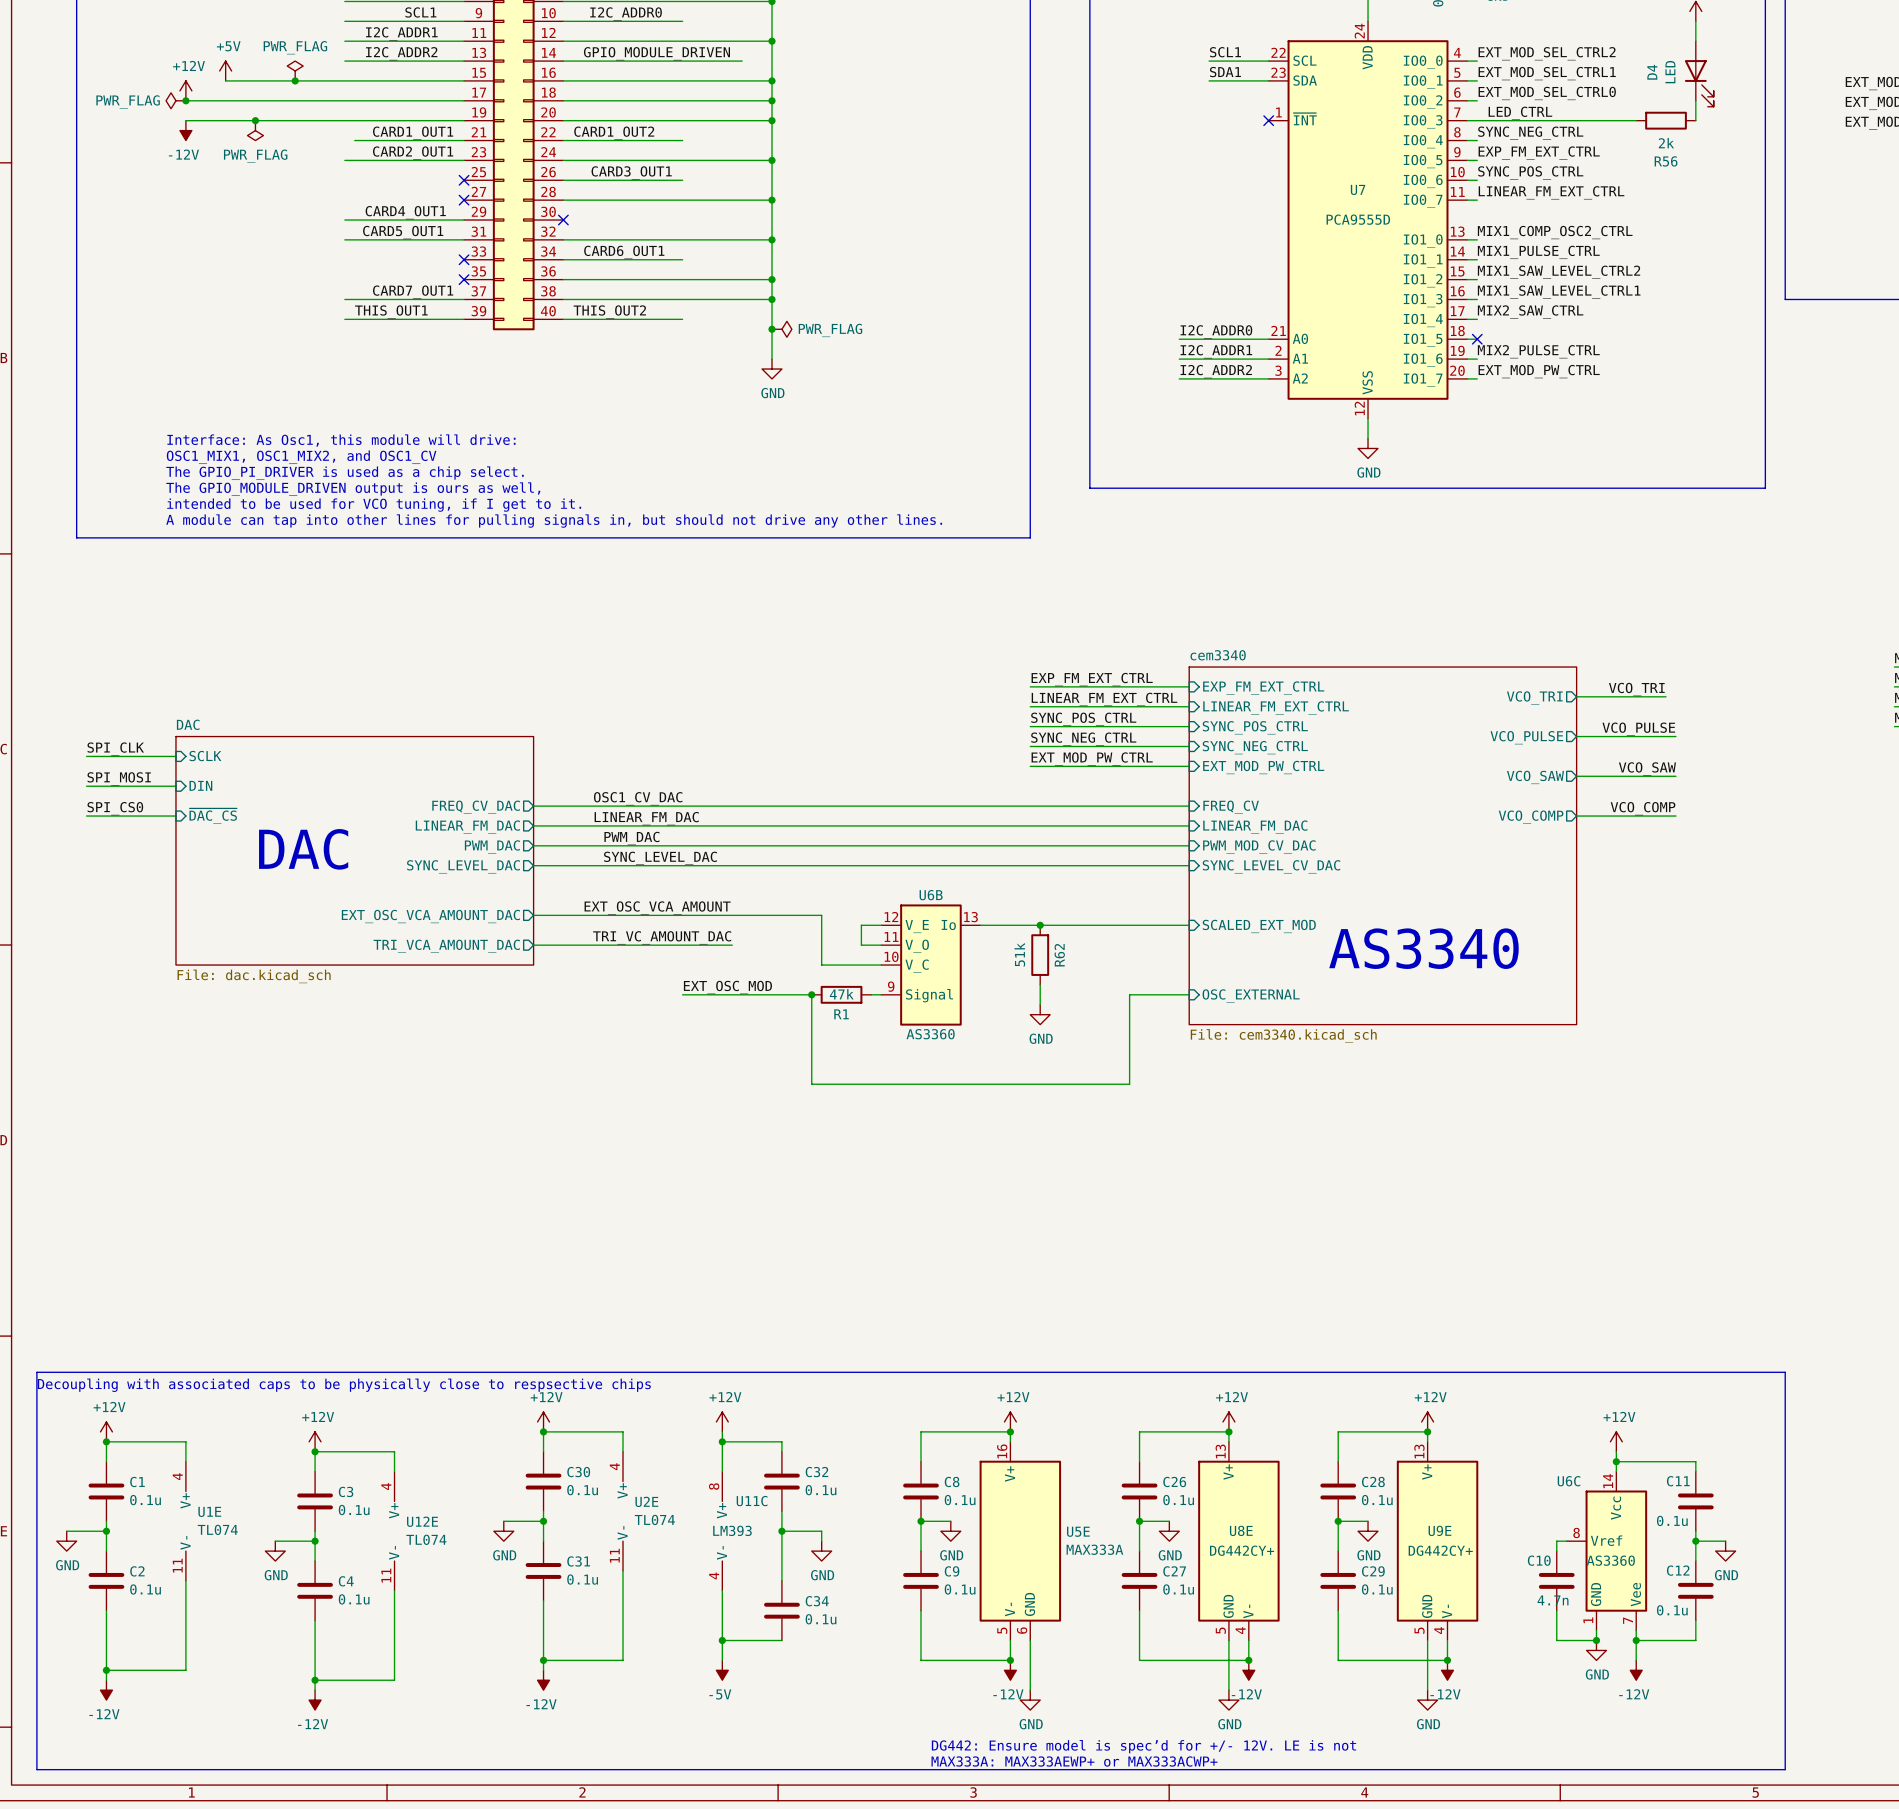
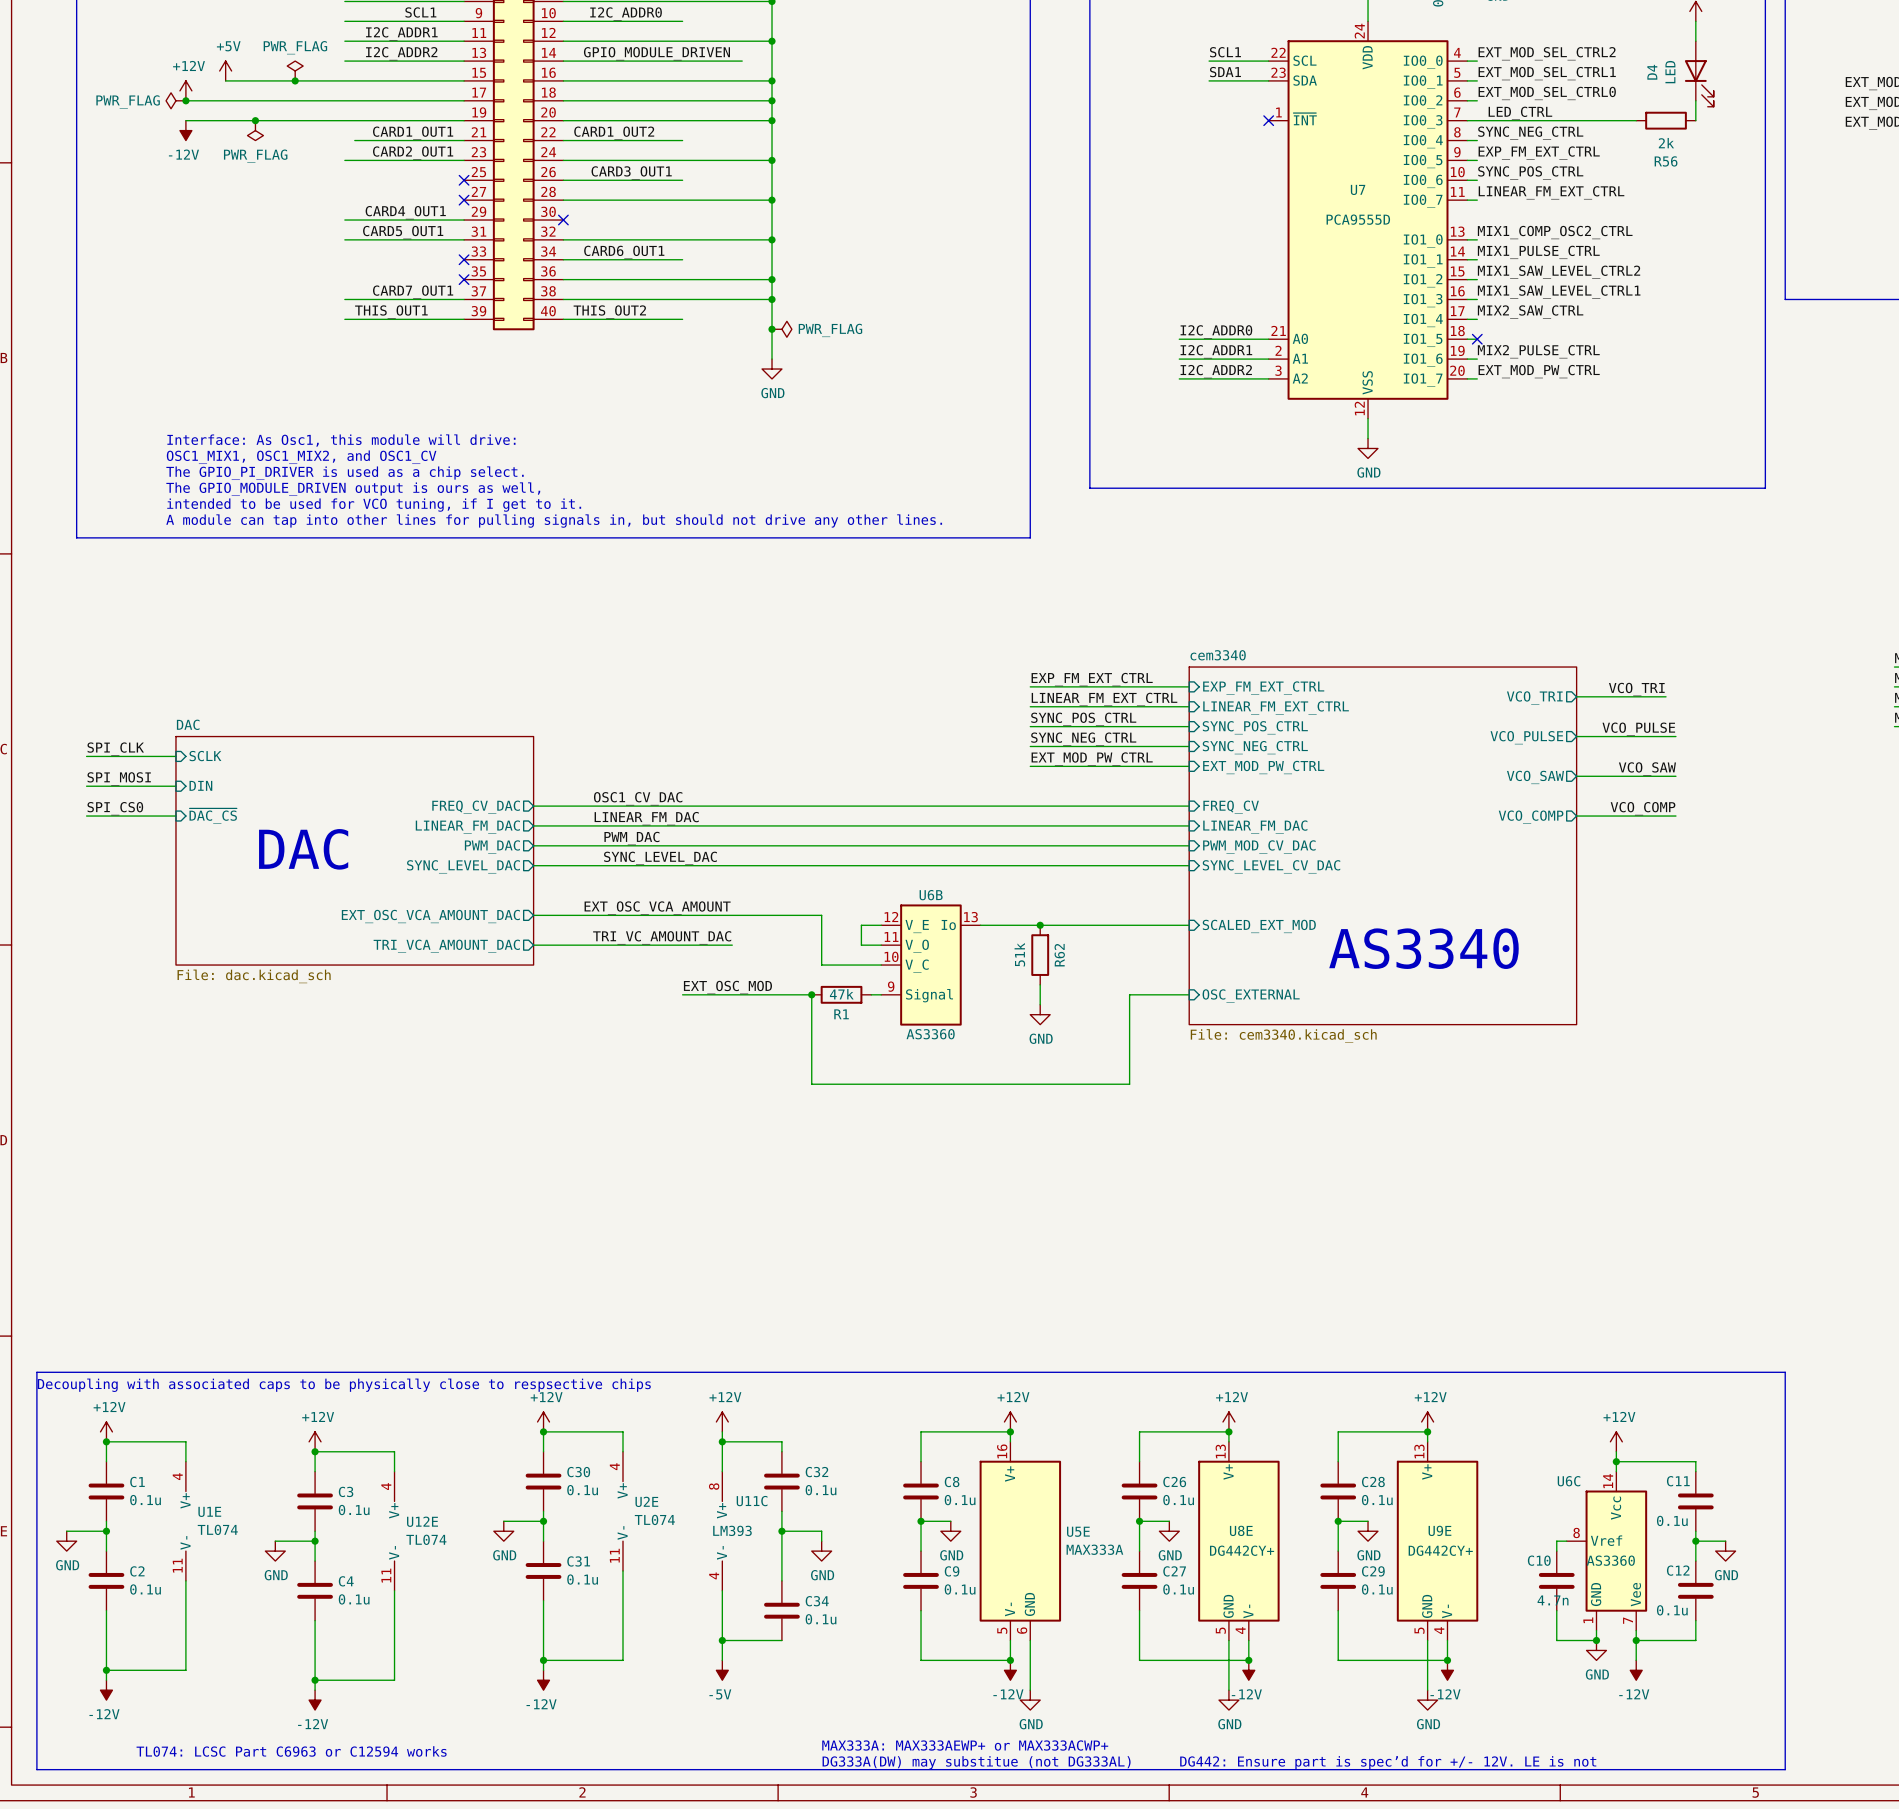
text: DG442: Ensure model is spec’d for +/- 12V. LE is not (1144, 1746) -> none
text: none -> TL074: LCSC Part C6963 or C12594 works (291, 1751)
text position: MAX333A: MAX333AEWP+ or MAX333ACWP+ (1074, 1761) -> MAX333A: MAX333AEWP+ or MAX333ACWP+ (965, 1745)
text: none -> DG333A(DW) may substitue (not DG333AL) (976, 1762)
text: none -> DG442: Ensure part is spec’d for +/- 12V. LE is not (1388, 1762)

